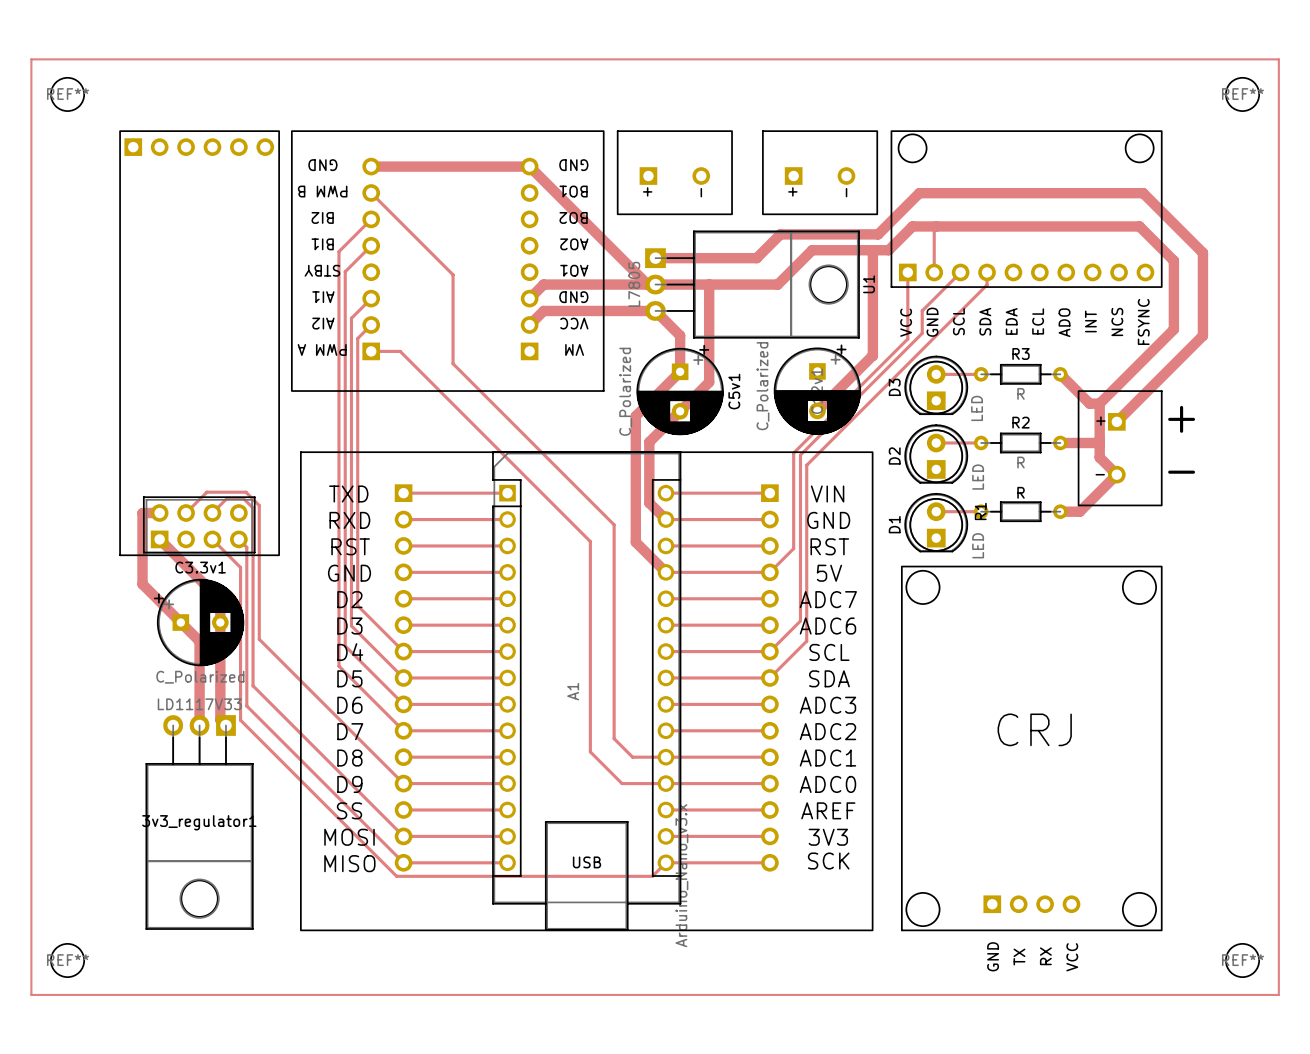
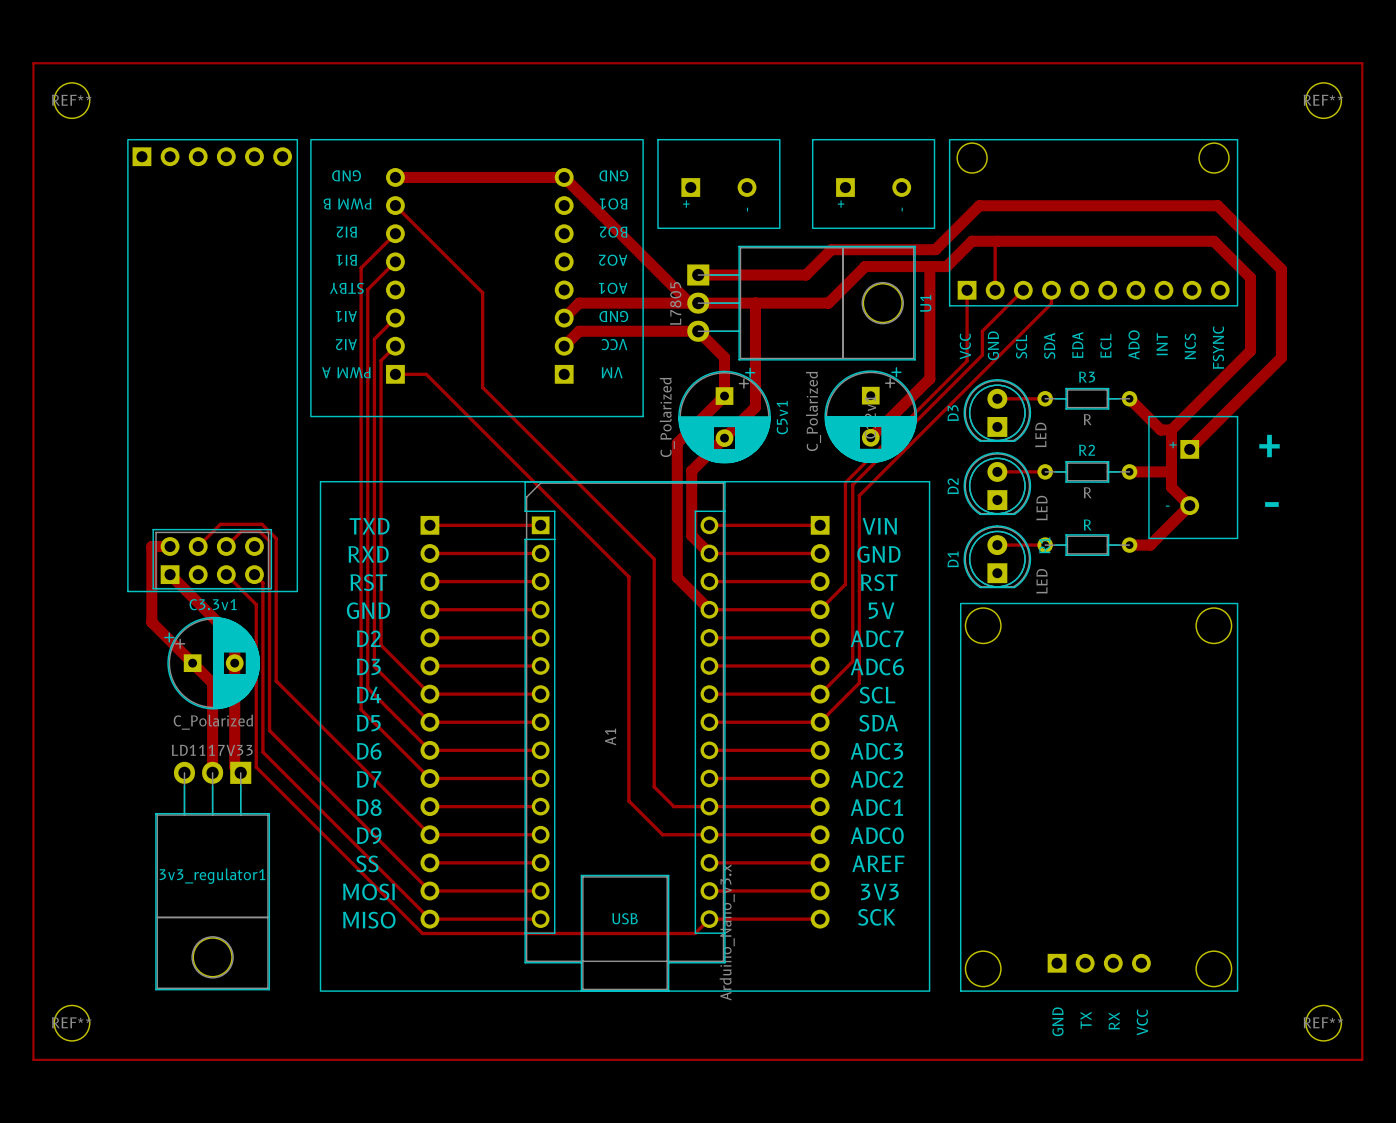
text: CRJ (1034, 729) -> none

